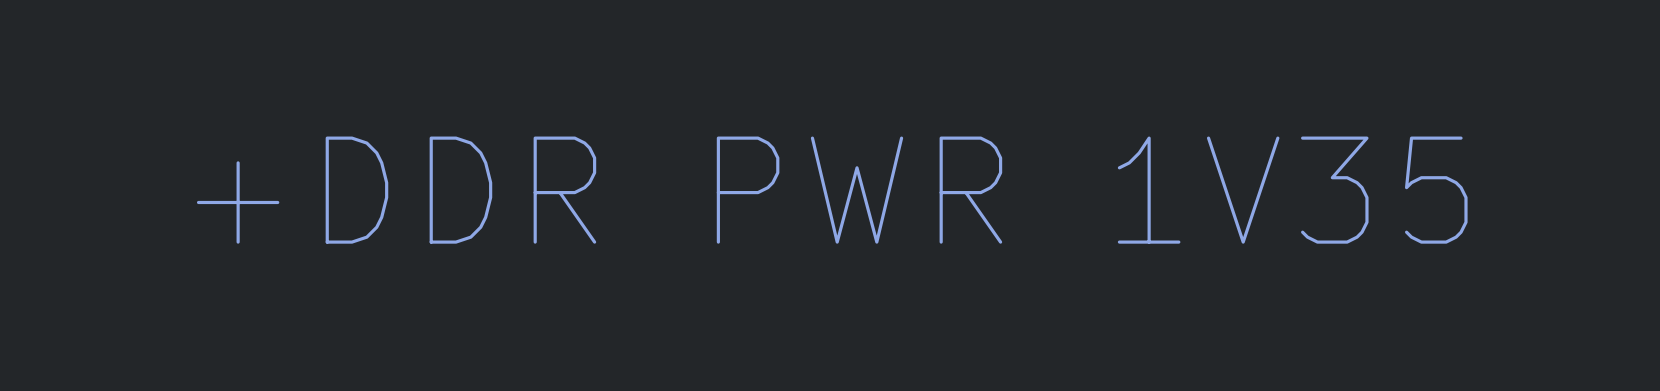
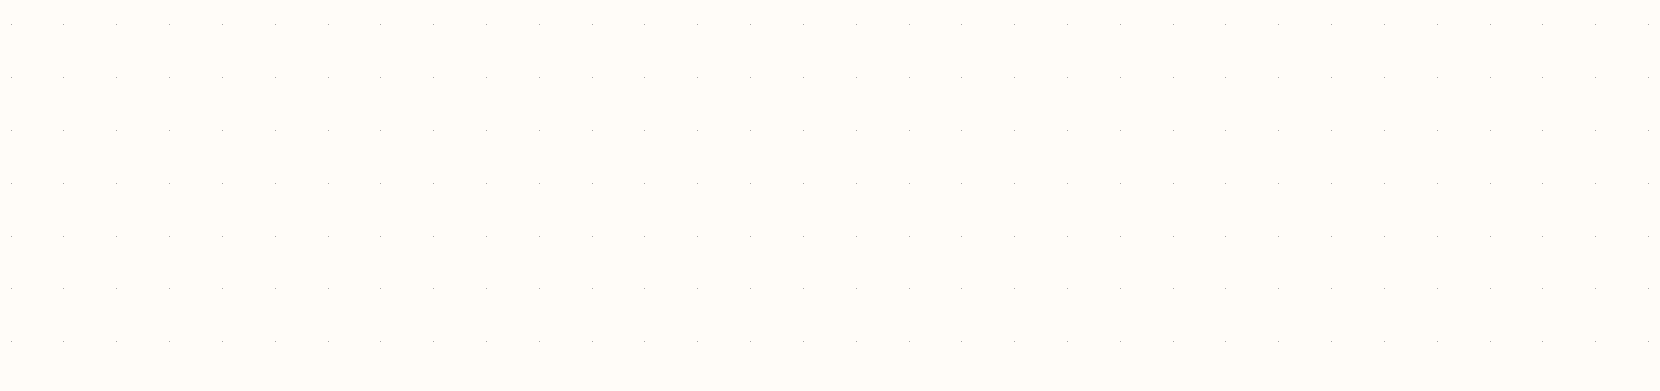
text: +DDR PWR 1V35 (832, 190) -> none

